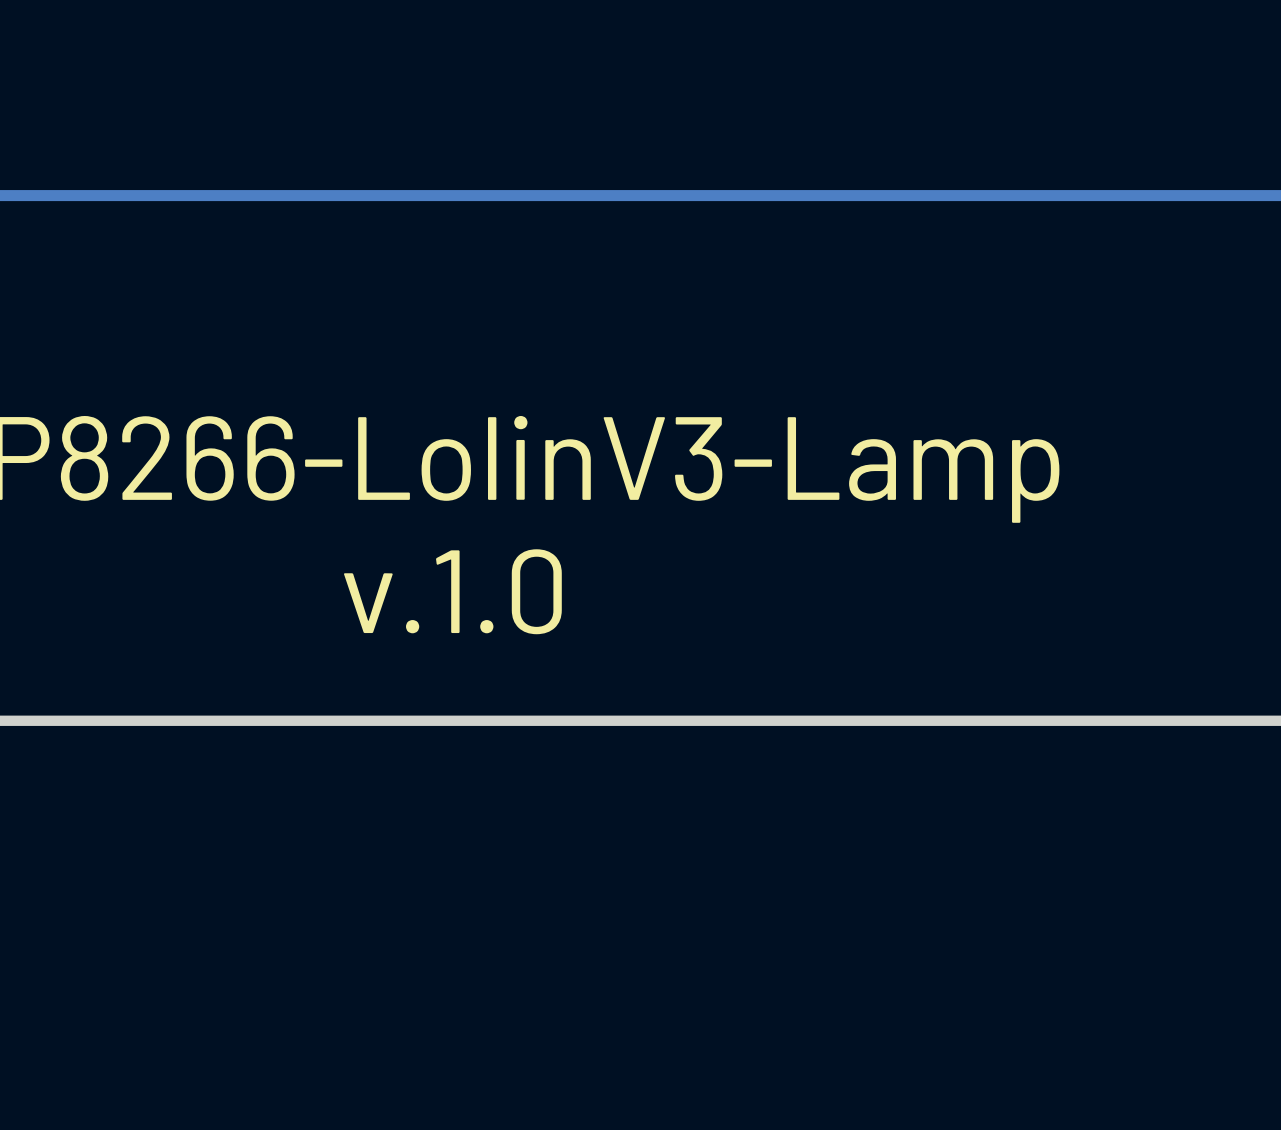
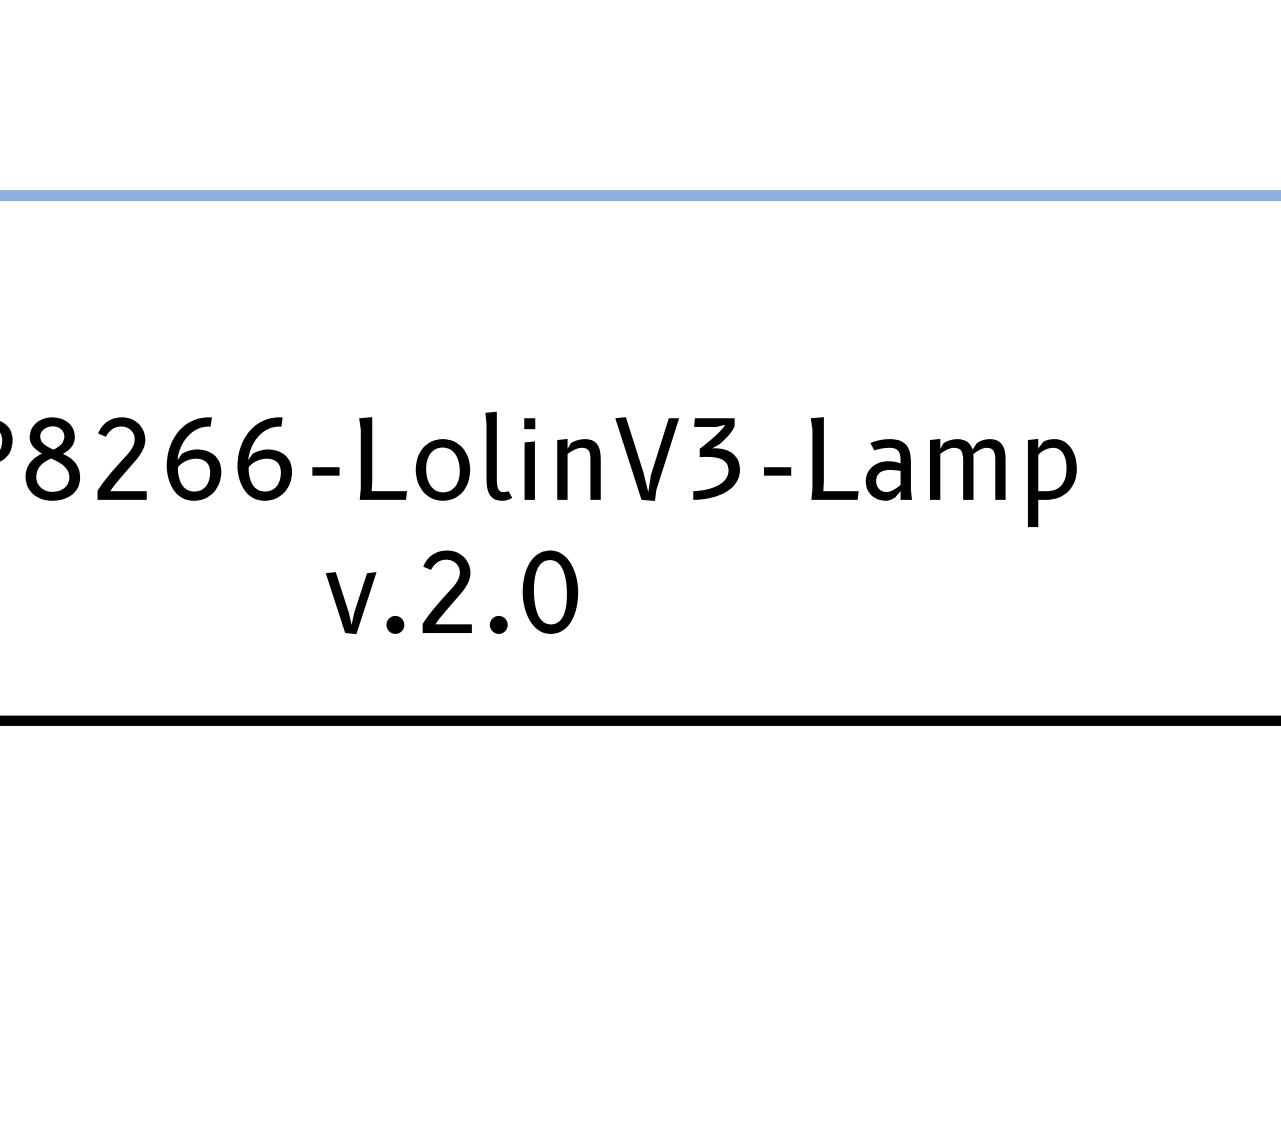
text: v.1.0 (452, 591) -> v.2.0 (451, 592)

